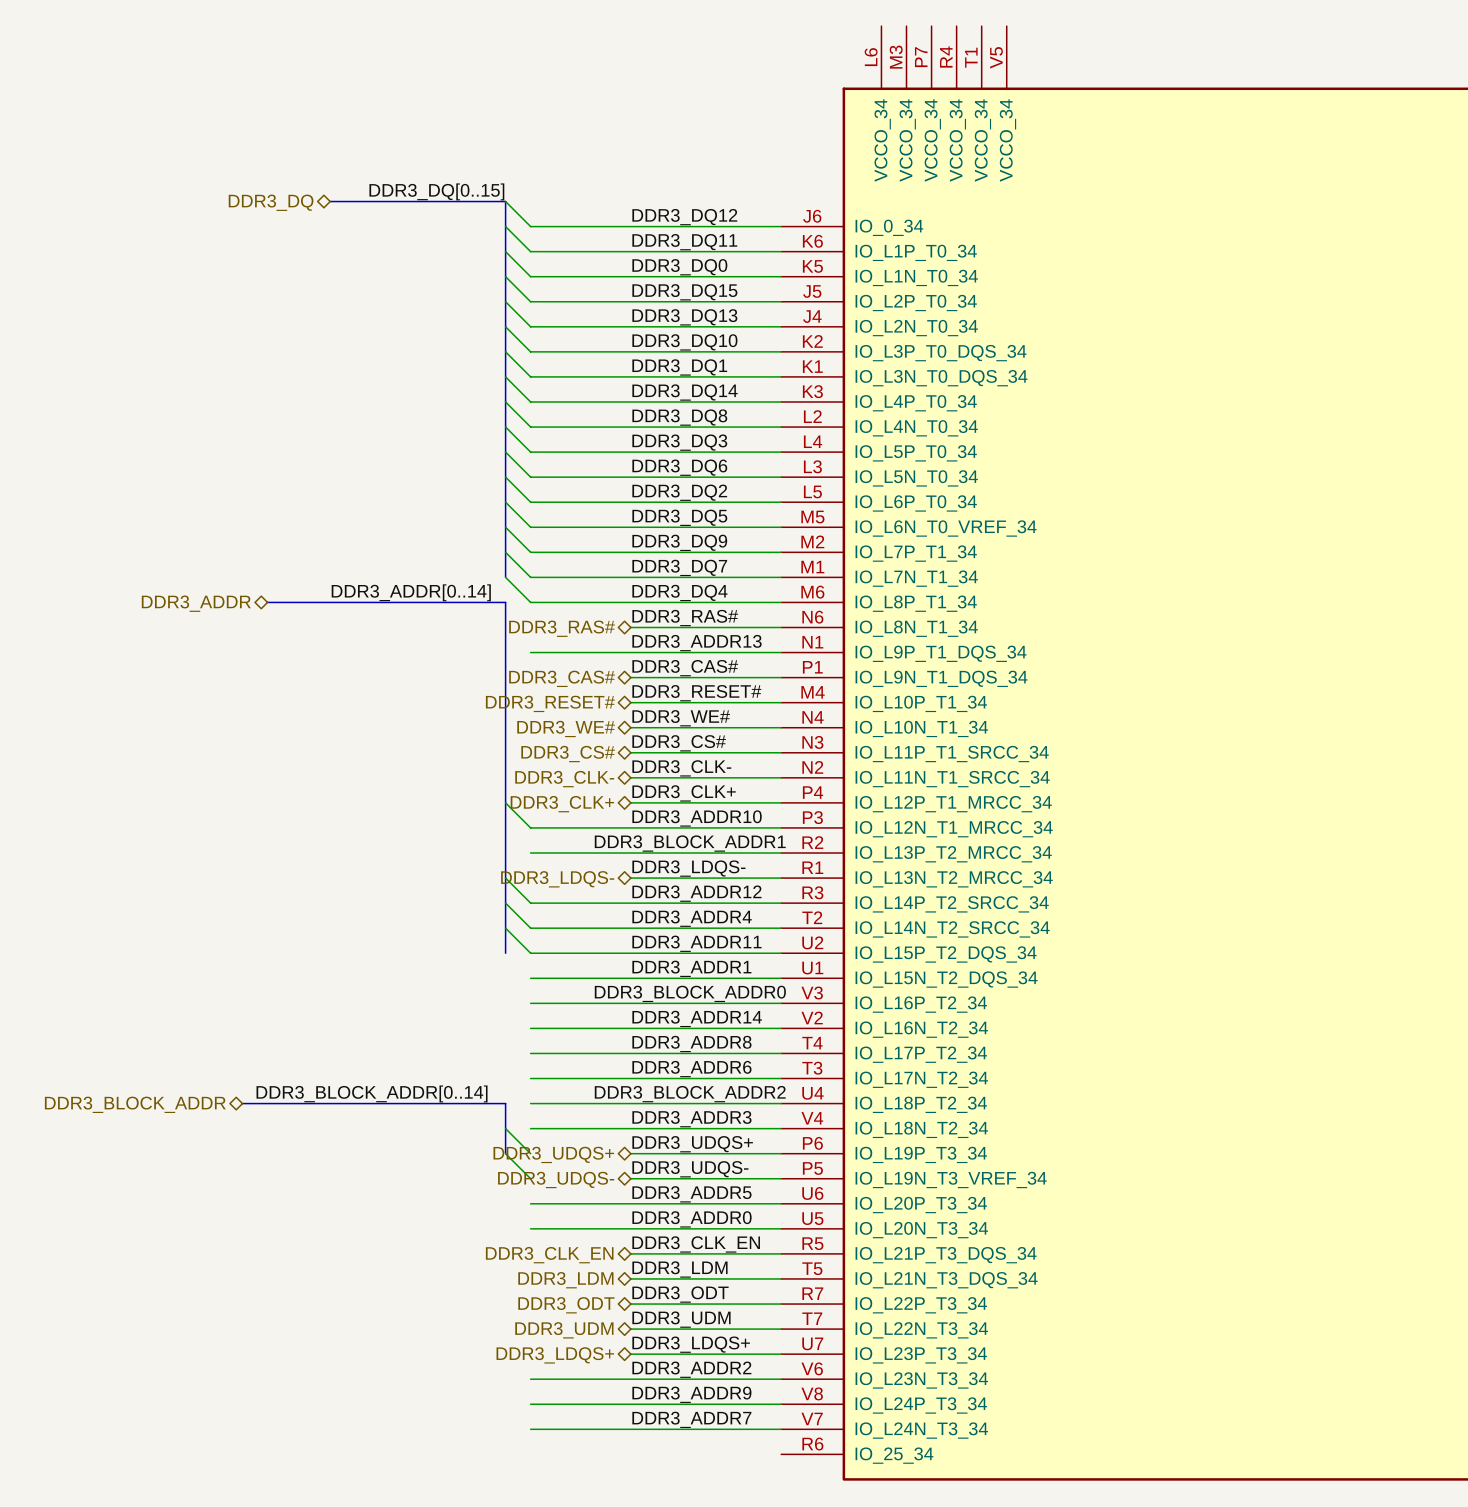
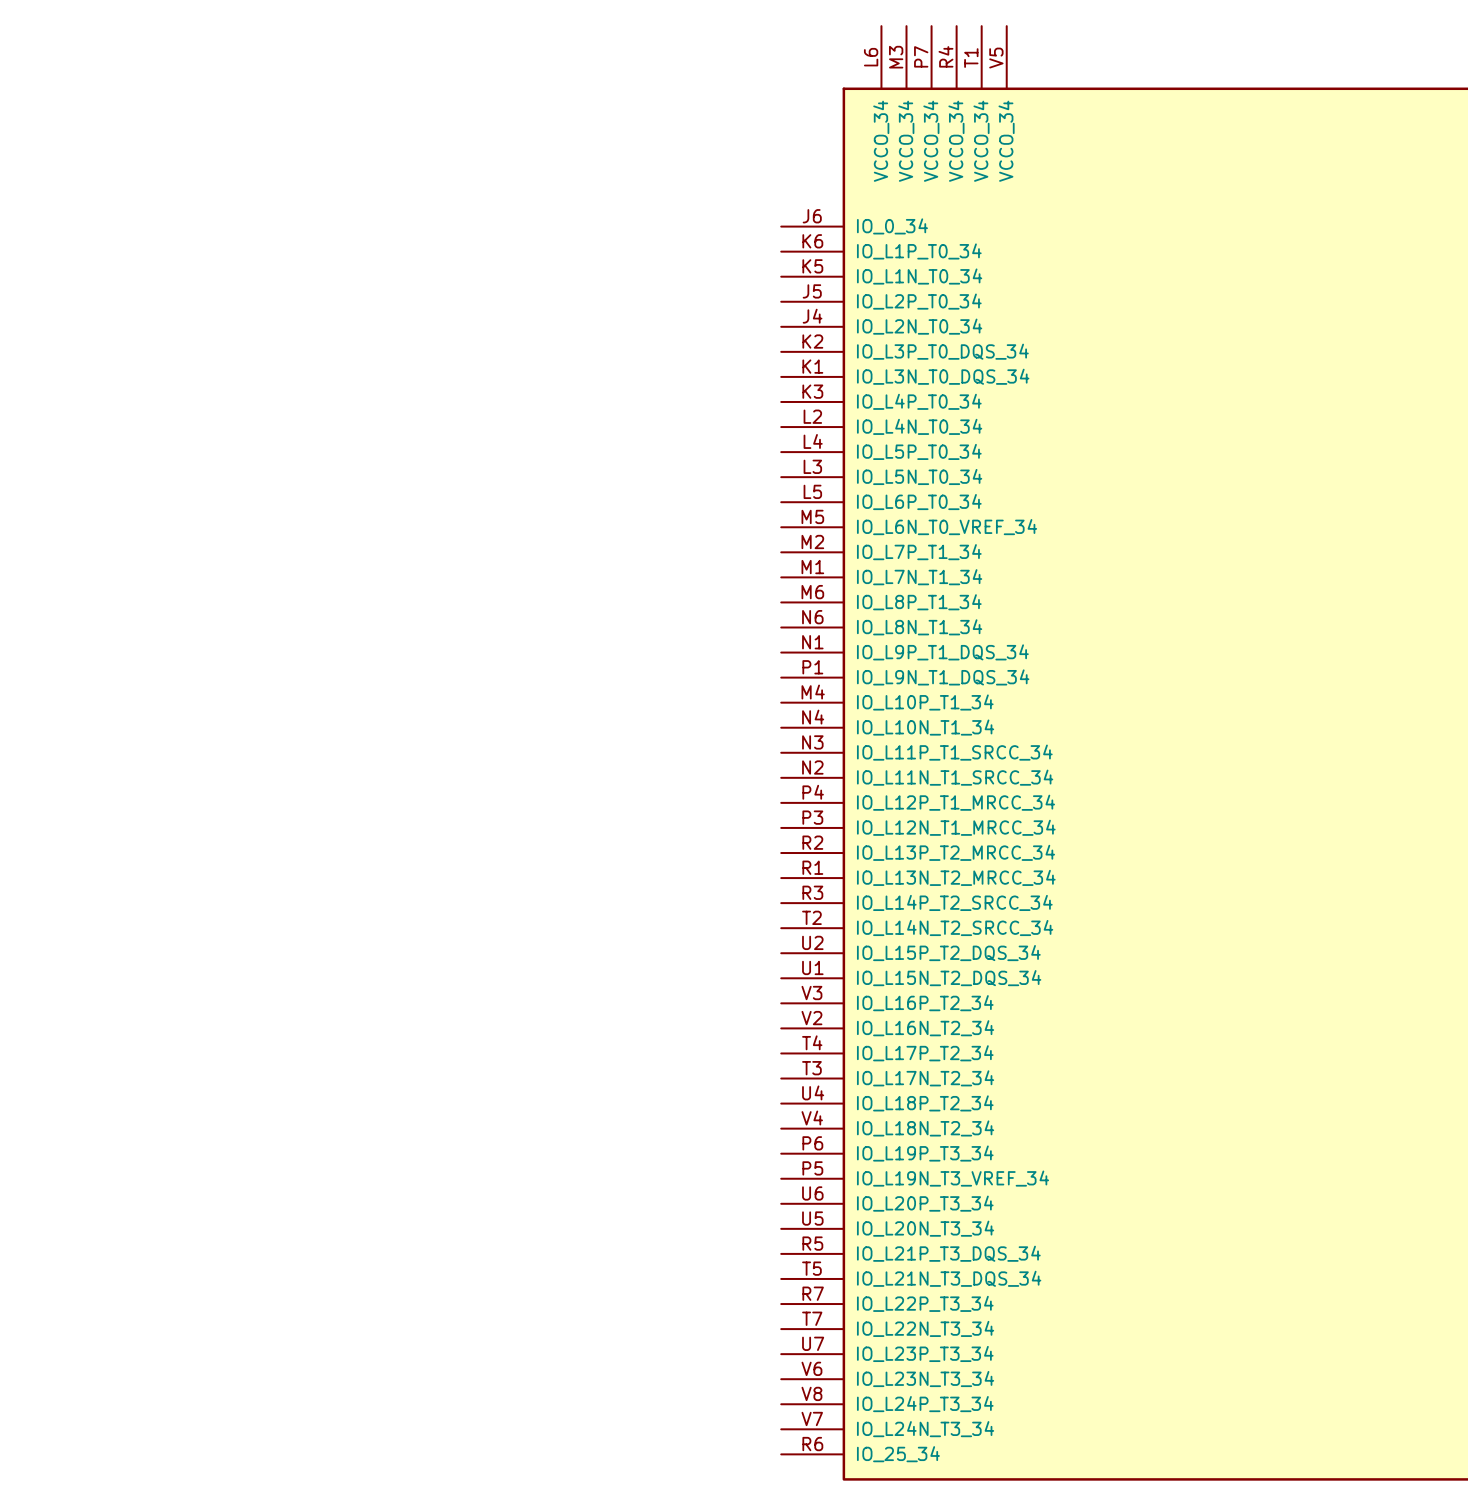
label: DDR3_DQ[0..15] (436, 191) -> none
bus: (330, 201) (505, 201) (505, 577) -> none
wire: (505, 201) (530, 226) (781, 226) -> none
hierarchical label: DDR3_DQ (271, 202) -> none
label: DDR3_DQ12 (684, 217) -> none
wire: (505, 226) (530, 251) (781, 251) -> none
label: DDR3_DQ11 (684, 242) -> none
wire: (505, 251) (530, 276) (781, 276) -> none
label: DDR3_DQ0 (679, 267) -> none
wire: (505, 276) (530, 301) (781, 301) -> none
label: DDR3_DQ15 (684, 292) -> none
wire: (505, 301) (530, 326) (781, 326) -> none
label: DDR3_DQ13 (684, 317) -> none
wire: (505, 326) (530, 351) (781, 351) -> none
label: DDR3_DQ10 (684, 342) -> none
wire: (505, 351) (530, 376) (781, 376) -> none
label: DDR3_DQ1 (679, 367) -> none
wire: (505, 376) (530, 401) (781, 401) -> none
label: DDR3_DQ14 (685, 392) -> none
wire: (505, 401) (530, 427) (781, 427) -> none
label: DDR3_DQ8 (679, 417) -> none
wire: (505, 427) (530, 452) (781, 452) -> none
label: DDR3_DQ3 (679, 442) -> none
wire: (505, 452) (530, 477) (781, 477) -> none
label: DDR3_DQ6 (679, 467) -> none
wire: (505, 477) (530, 502) (781, 502) -> none
label: DDR3_DQ2 (679, 492) -> none
wire: (505, 502) (530, 527) (781, 527) -> none
label: DDR3_DQ5 (679, 517) -> none
wire: (505, 527) (530, 552) (781, 552) -> none
label: DDR3_DQ9 (679, 542) -> none
wire: (505, 552) (530, 577) (781, 577) -> none
label: DDR3_DQ7 (679, 567) -> none
wire: (505, 577) (530, 602) (781, 602) -> none
label: DDR3_ADDR[0..14] (411, 592) -> none
label: DDR3_DQ4 (679, 592) -> none
bus: (267, 602) (505, 602) (505, 953) -> none
hierarchical label: DDR3_ADDR (196, 603) -> none
label: DDR3_RAS# (685, 618) -> none
wire: (630, 627) (781, 627) -> none
hierarchical label: DDR3_RAS# (562, 628) -> none
label: DDR3_ADDR13 (697, 643) -> none
wire: (530, 652) (781, 652) -> none
label: DDR3_CAS# (685, 668) -> none
wire: (630, 677) (781, 677) -> none
hierarchical label: DDR3_CAS# (562, 678) -> none
label: DDR3_RESET# (696, 693) -> none
wire: (630, 702) (781, 702) -> none
hierarchical label: DDR3_RESET# (550, 703) -> none
label: DDR3_WE# (681, 718) -> none
wire: (630, 727) (781, 727) -> none
hierarchical label: DDR3_WE# (566, 728) -> none
label: DDR3_CS# (679, 743) -> none
wire: (630, 752) (781, 752) -> none
hierarchical label: DDR3_CS# (568, 754) -> none
label: DDR3_CLK- (681, 768) -> none
wire: (630, 777) (781, 777) -> none
hierarchical label: DDR3_CLK- (564, 779) -> none
label: DDR3_CLK+ (684, 793) -> none
wire: (505, 802) (530, 827) (781, 827) -> none
wire: (630, 802) (781, 802) -> none
hierarchical label: DDR3_CLK+ (562, 804) -> none
label: DDR3_ADDR10 (697, 818) -> none
label: DDR3_BLOCK_ADDR1 (690, 843) -> none
wire: (530, 853) (781, 853) -> none
label: DDR3_LDQS- (688, 868) -> none
wire: (505, 878) (530, 903) (781, 903) -> none
wire: (630, 878) (781, 878) -> none
hierarchical label: DDR3_LDQS- (557, 879) -> none
label: DDR3_ADDR12 (696, 893) -> none
wire: (505, 903) (530, 928) (781, 928) -> none
label: DDR3_ADDR4 (692, 918) -> none
wire: (505, 928) (530, 953) (781, 953) -> none
label: DDR3_ADDR11 (696, 943) -> none
label: DDR3_ADDR1 (691, 968) -> none
wire: (530, 978) (781, 978) -> none
label: DDR3_BLOCK_ADDR0 (690, 993) -> none
wire: (530, 1003) (781, 1003) -> none
label: DDR3_ADDR14 (697, 1018) -> none
wire: (530, 1028) (781, 1028) -> none
label: DDR3_ADDR8 (691, 1043) -> none
wire: (530, 1053) (781, 1053) -> none
label: DDR3_ADDR6 (691, 1069) -> none
wire: (530, 1078) (781, 1078) -> none
label: DDR3_BLOCK_ADDR[0..14] (372, 1093) -> none
label: DDR3_BLOCK_ADDR2 (690, 1094) -> none
bus: (242, 1103) (505, 1103) (505, 1153) -> none
wire: (530, 1103) (781, 1103) -> none
hierarchical label: DDR3_BLOCK_ADDR (135, 1104) -> none
label: DDR3_ADDR3 (691, 1119) -> none
wire: (505, 1128) (530, 1153) -> none
wire: (530, 1128) (781, 1128) -> none
label: DDR3_UDQS+ (692, 1144) -> none
wire: (505, 1153) (530, 1178) -> none
wire: (630, 1153) (781, 1153) -> none
hierarchical label: DDR3_UDQS+ (553, 1154) -> none
label: DDR3_UDQS- (690, 1169) -> none
wire: (630, 1178) (781, 1178) -> none
hierarchical label: DDR3_UDQS- (556, 1179) -> none
label: DDR3_ADDR5 (691, 1194) -> none
wire: (530, 1203) (781, 1203) -> none
label: DDR3_ADDR0 (691, 1219) -> none
wire: (530, 1228) (781, 1228) -> none
label: DDR3_CLK_EN (696, 1244) -> none
wire: (630, 1253) (781, 1253) -> none
hierarchical label: DDR3_CLK_EN (549, 1255) -> none
label: DDR3_LDM (679, 1269) -> none
wire: (630, 1278) (781, 1278) -> none
hierarchical label: DDR3_LDM (565, 1280) -> none
label: DDR3_ODT (680, 1294) -> none
wire: (630, 1304) (781, 1304) -> none
hierarchical label: DDR3_ODT (566, 1305) -> none
label: DDR3_UDM (681, 1319) -> none
wire: (630, 1329) (781, 1329) -> none
hierarchical label: DDR3_UDM (564, 1330) -> none
label: DDR3_LDQS+ (691, 1344) -> none
wire: (630, 1354) (781, 1354) -> none
hierarchical label: DDR3_LDQS+ (555, 1355) -> none
label: DDR3_ADDR2 (691, 1369) -> none
wire: (530, 1379) (781, 1379) -> none
label: DDR3_ADDR9 (691, 1394) -> none
wire: (530, 1404) (781, 1404) -> none
label: DDR3_ADDR7 (691, 1419) -> none
wire: (530, 1429) (781, 1429) -> none

